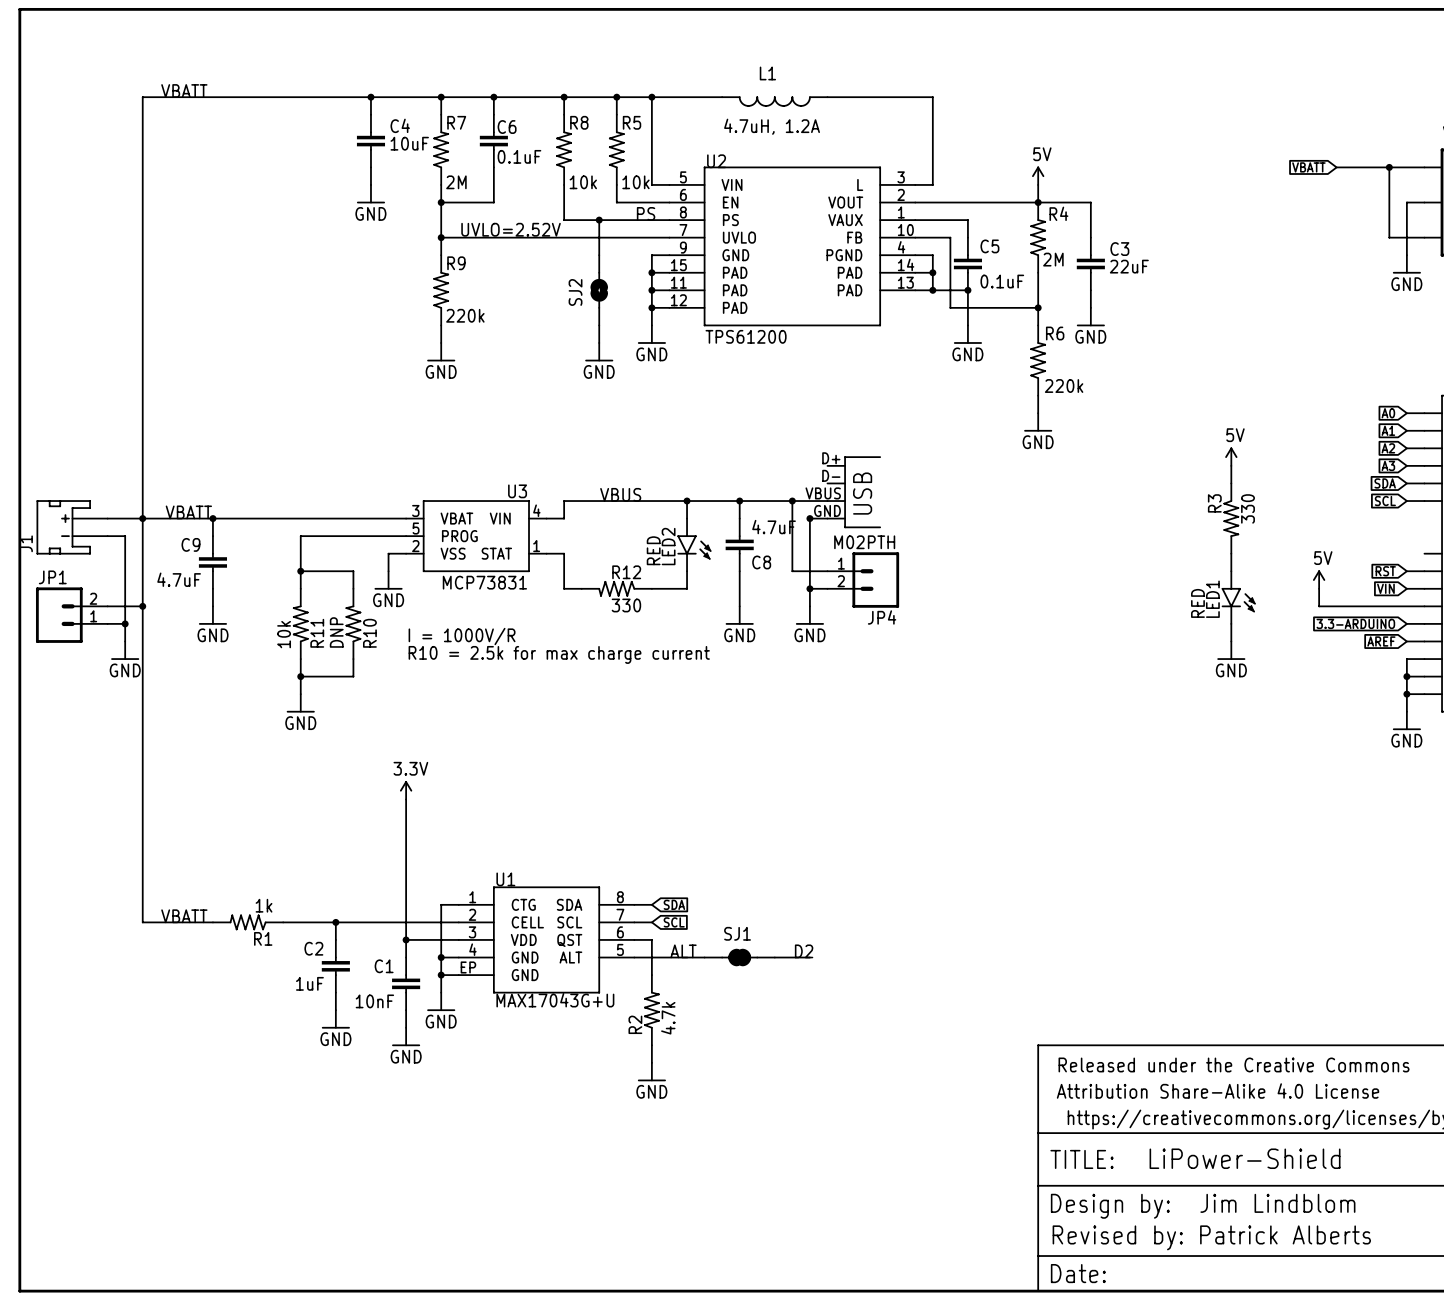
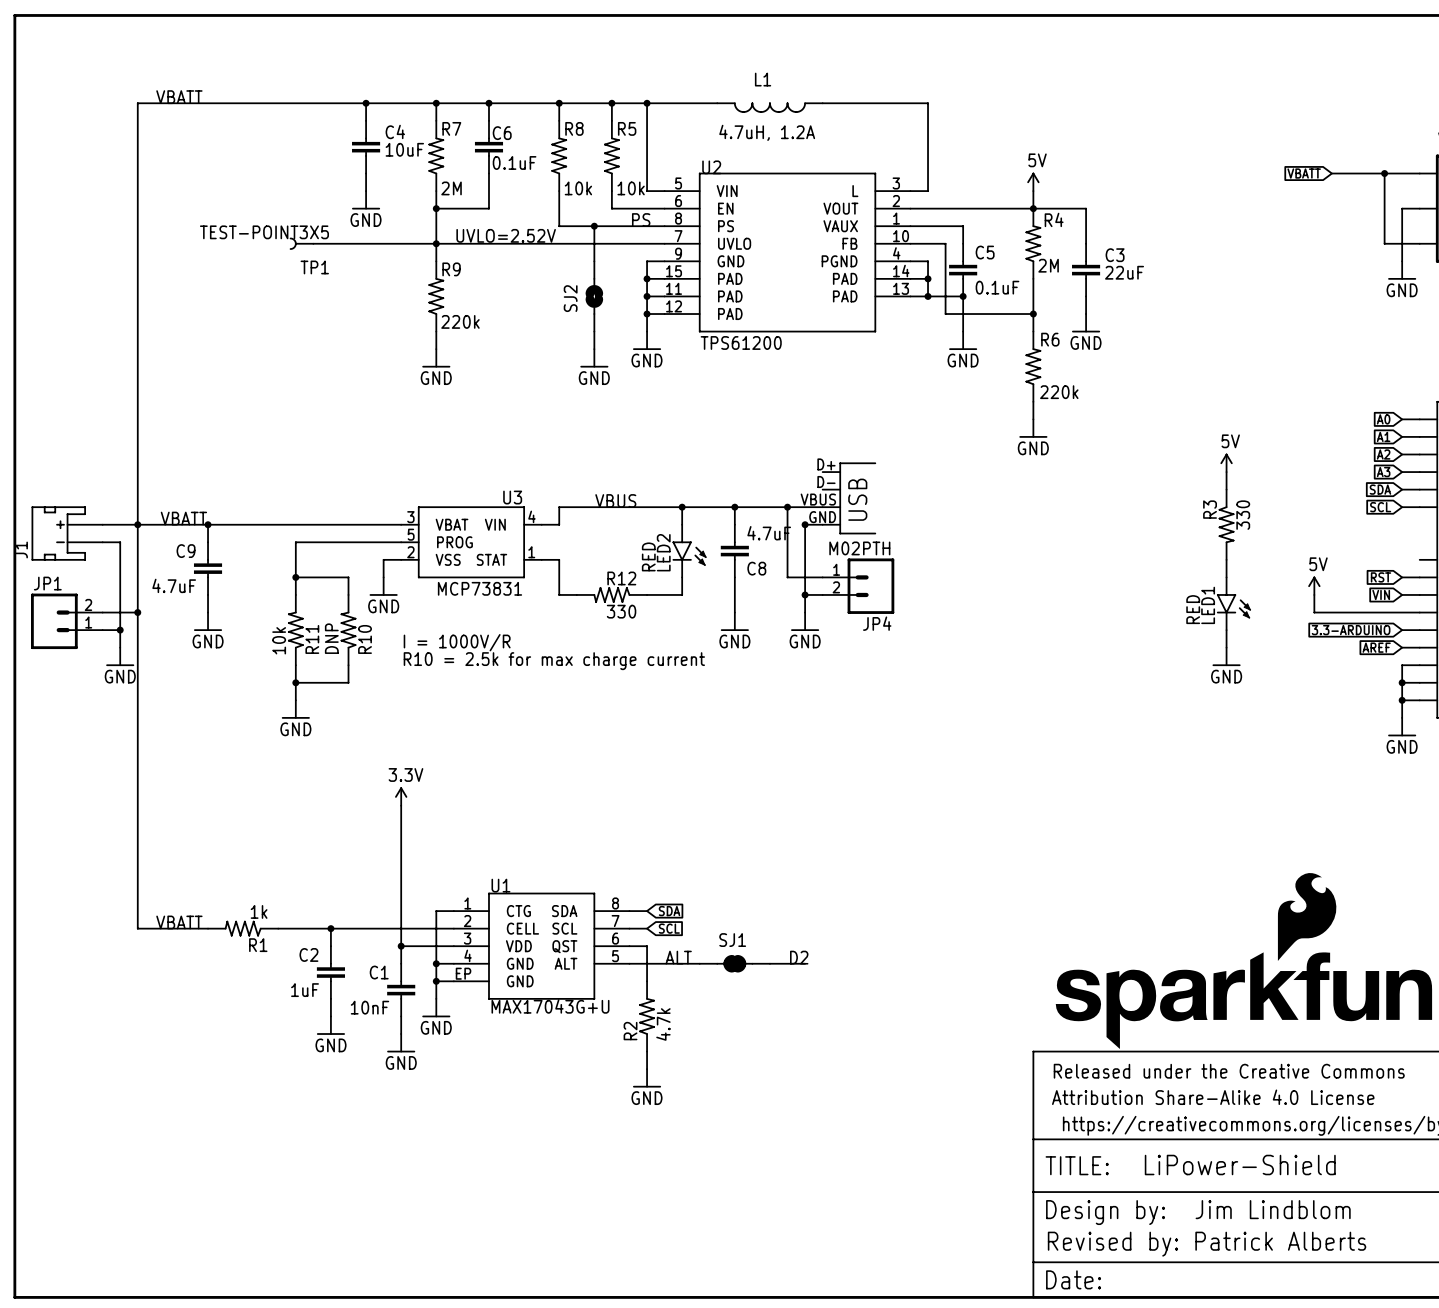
TP1: none -> TEST-POINT3X5 (301, 243)
wire: none -> (313, 243) (436, 243)
part: none -> (1243, 961)

